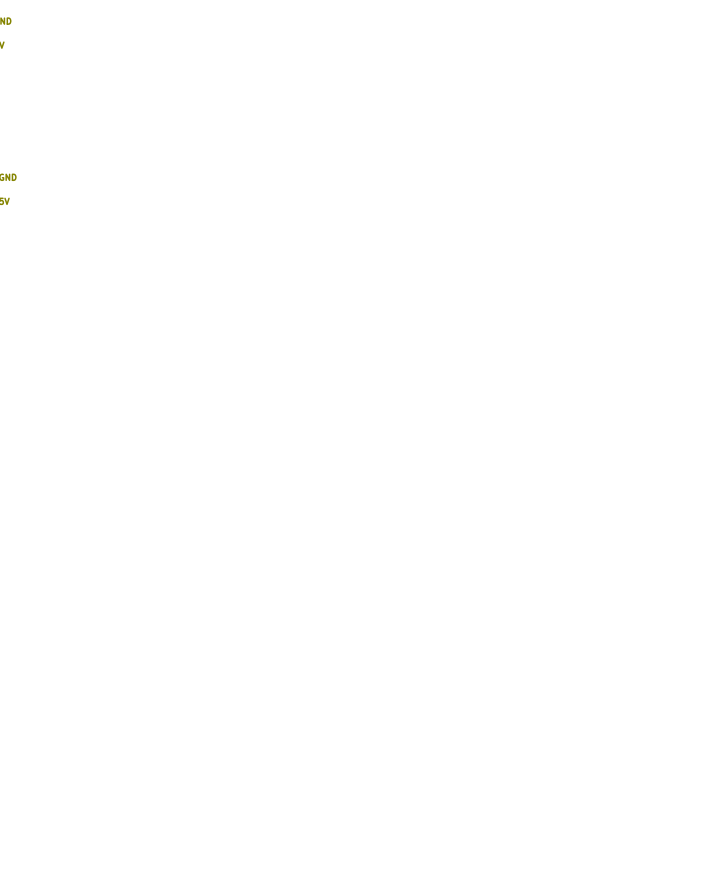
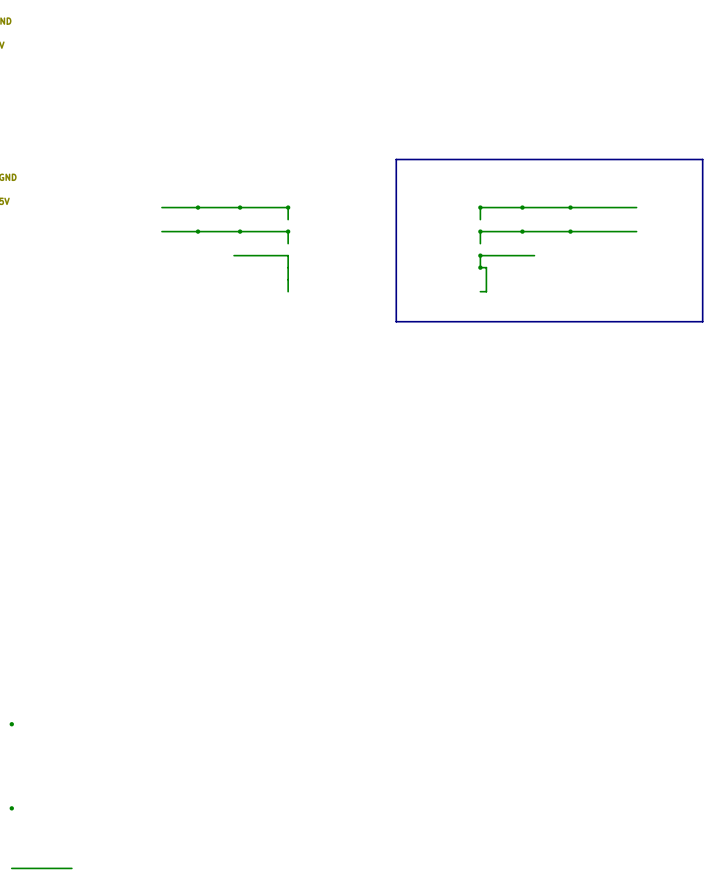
line: none -> (396, 159) (702, 159) (702, 321) (396, 321) (396, 159)
wire: none -> (161, 207) (288, 207) (288, 219)
junction: none -> (198, 207)
junction: none -> (240, 207)
junction: none -> (288, 207)
junction: none -> (480, 207)
junction: none -> (522, 207)
junction: none -> (570, 207)
wire: none -> (636, 207) (480, 207) (480, 219)
wire: none -> (161, 231) (288, 231) (288, 243)
junction: none -> (198, 231)
junction: none -> (240, 231)
junction: none -> (288, 231)
junction: none -> (480, 231)
junction: none -> (522, 231)
junction: none -> (570, 231)
wire: none -> (636, 231) (480, 231) (480, 243)
wire: none -> (234, 255) (288, 255) (288, 291)
junction: none -> (480, 255)
wire: none -> (534, 255) (480, 255) (480, 267) (486, 267) (486, 291) (480, 291)
junction: none -> (480, 267)
junction: none -> (11, 724)
junction: none -> (11, 808)
wire: none -> (11, 868) (71, 868)

